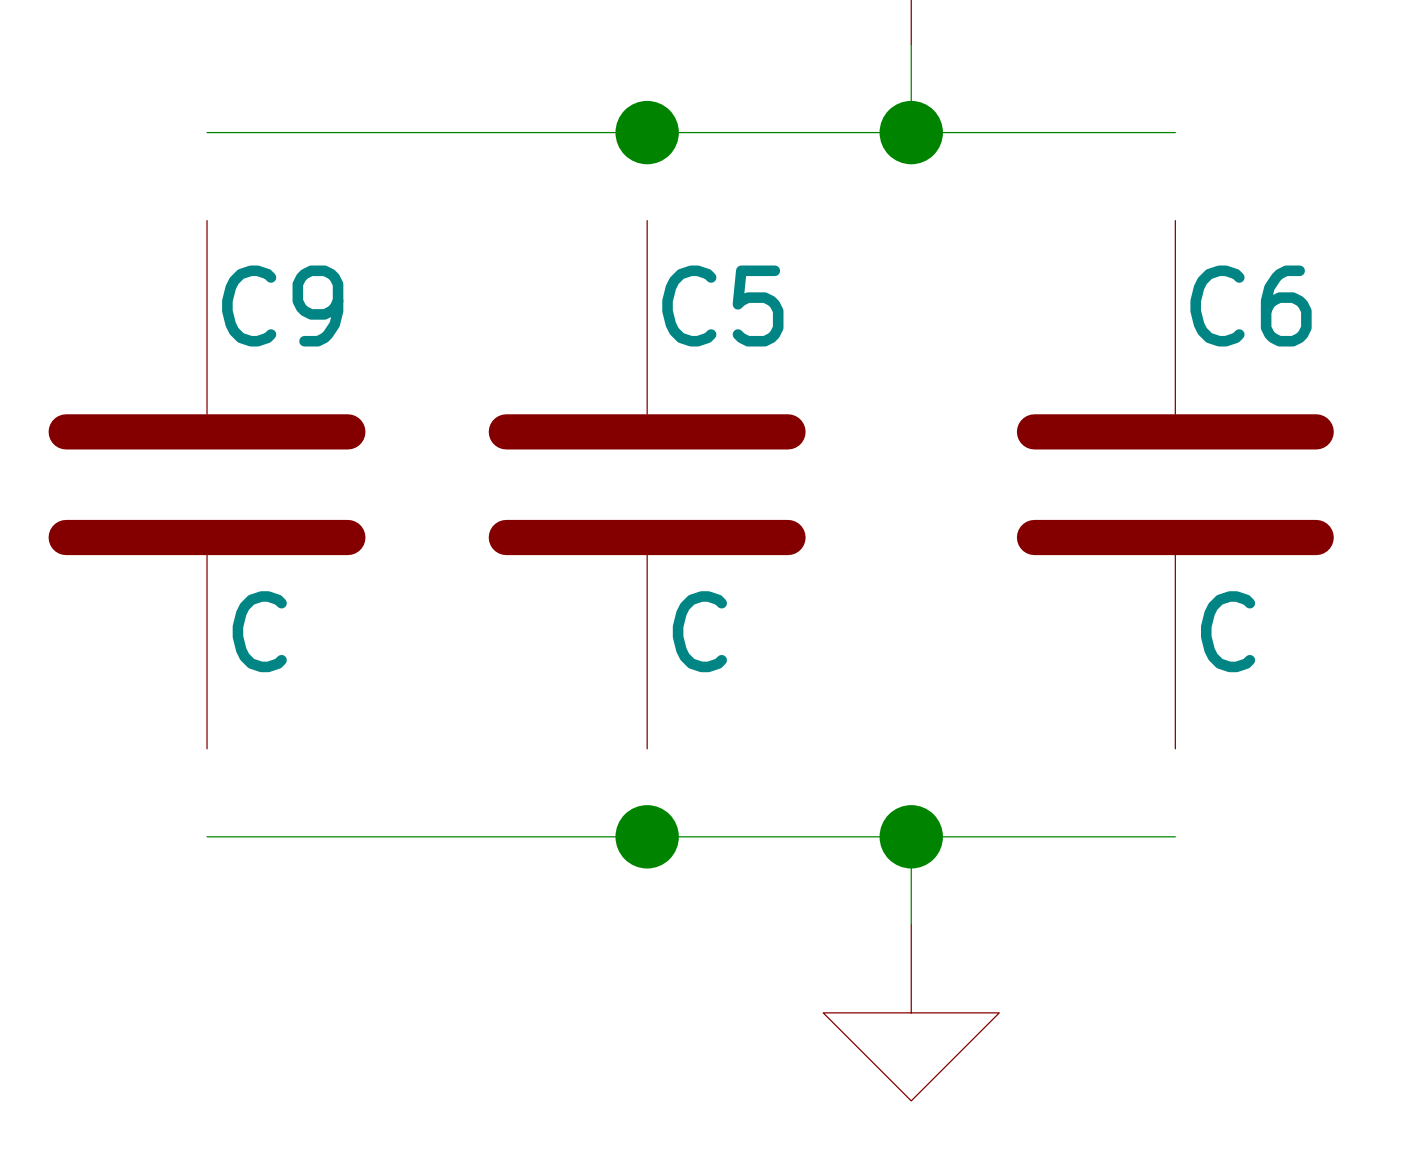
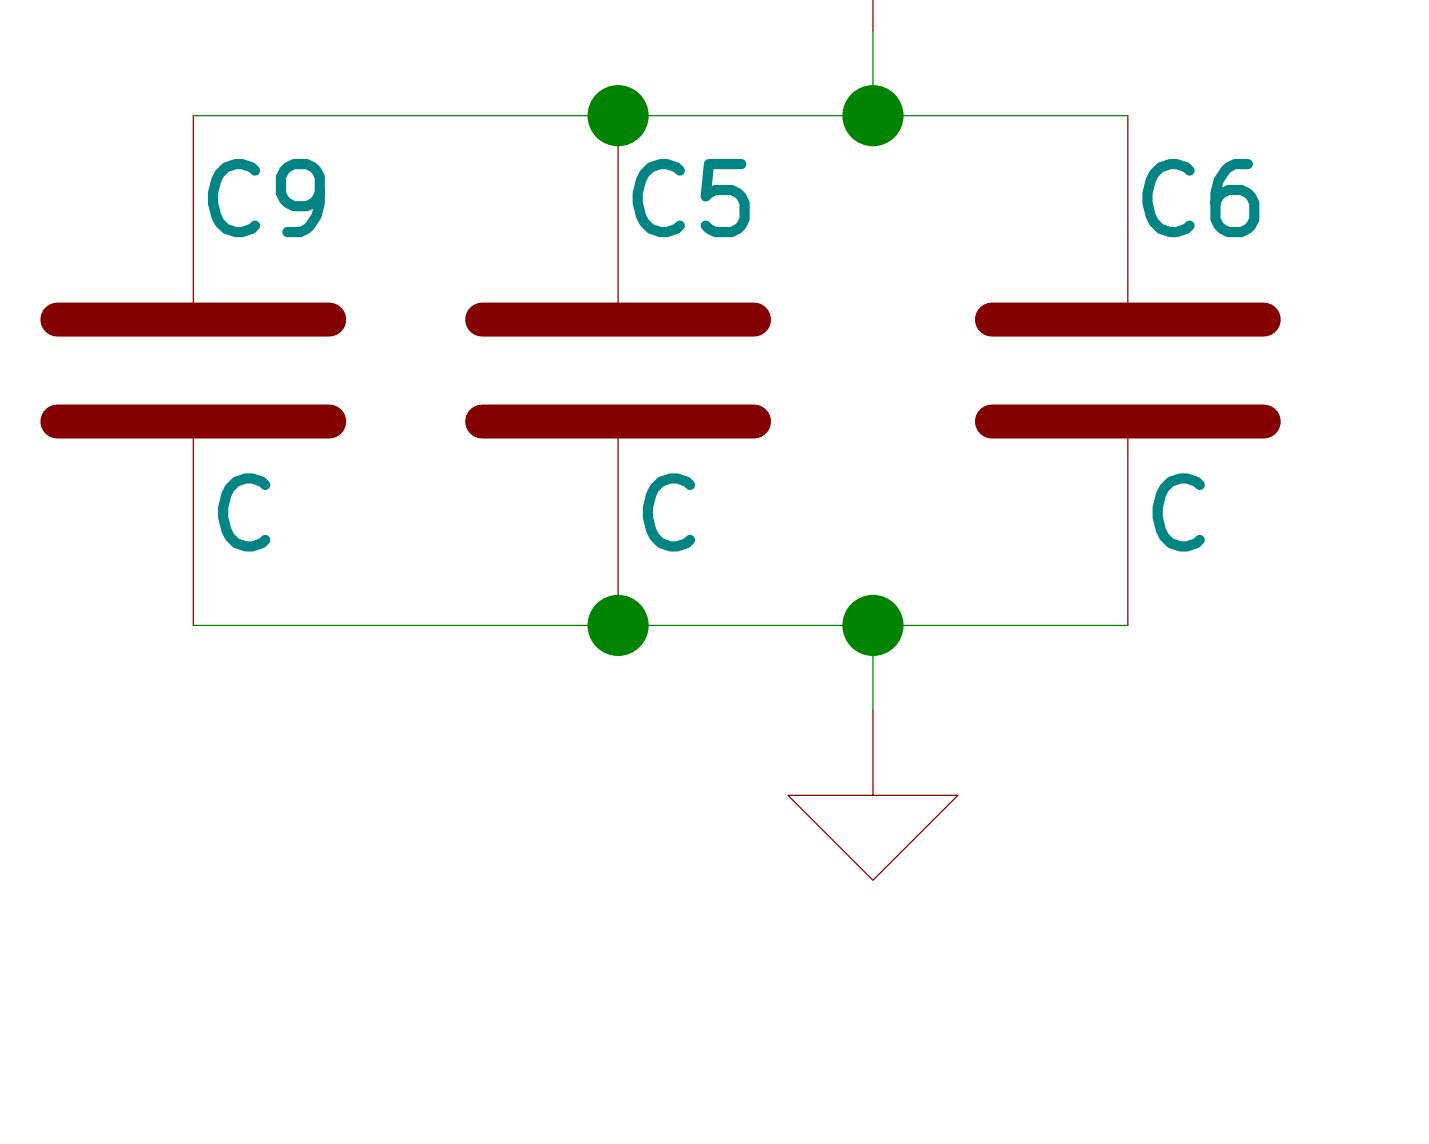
C9 position: (207, 484) -> (193, 370)
C5 position: (647, 484) -> (618, 370)
C6 position: (1175, 484) -> (1127, 370)
junction: none -> (618, 625)
junction: none -> (872, 625)
wire: (207, 836) (1175, 836) -> (193, 625) (1127, 625)
junction: (647, 836) -> none
wire: (911, 836) (911, 924) -> (872, 625) (872, 710)
junction: (911, 836) -> none
power symbol position: (911, 1012) -> (872, 795)

